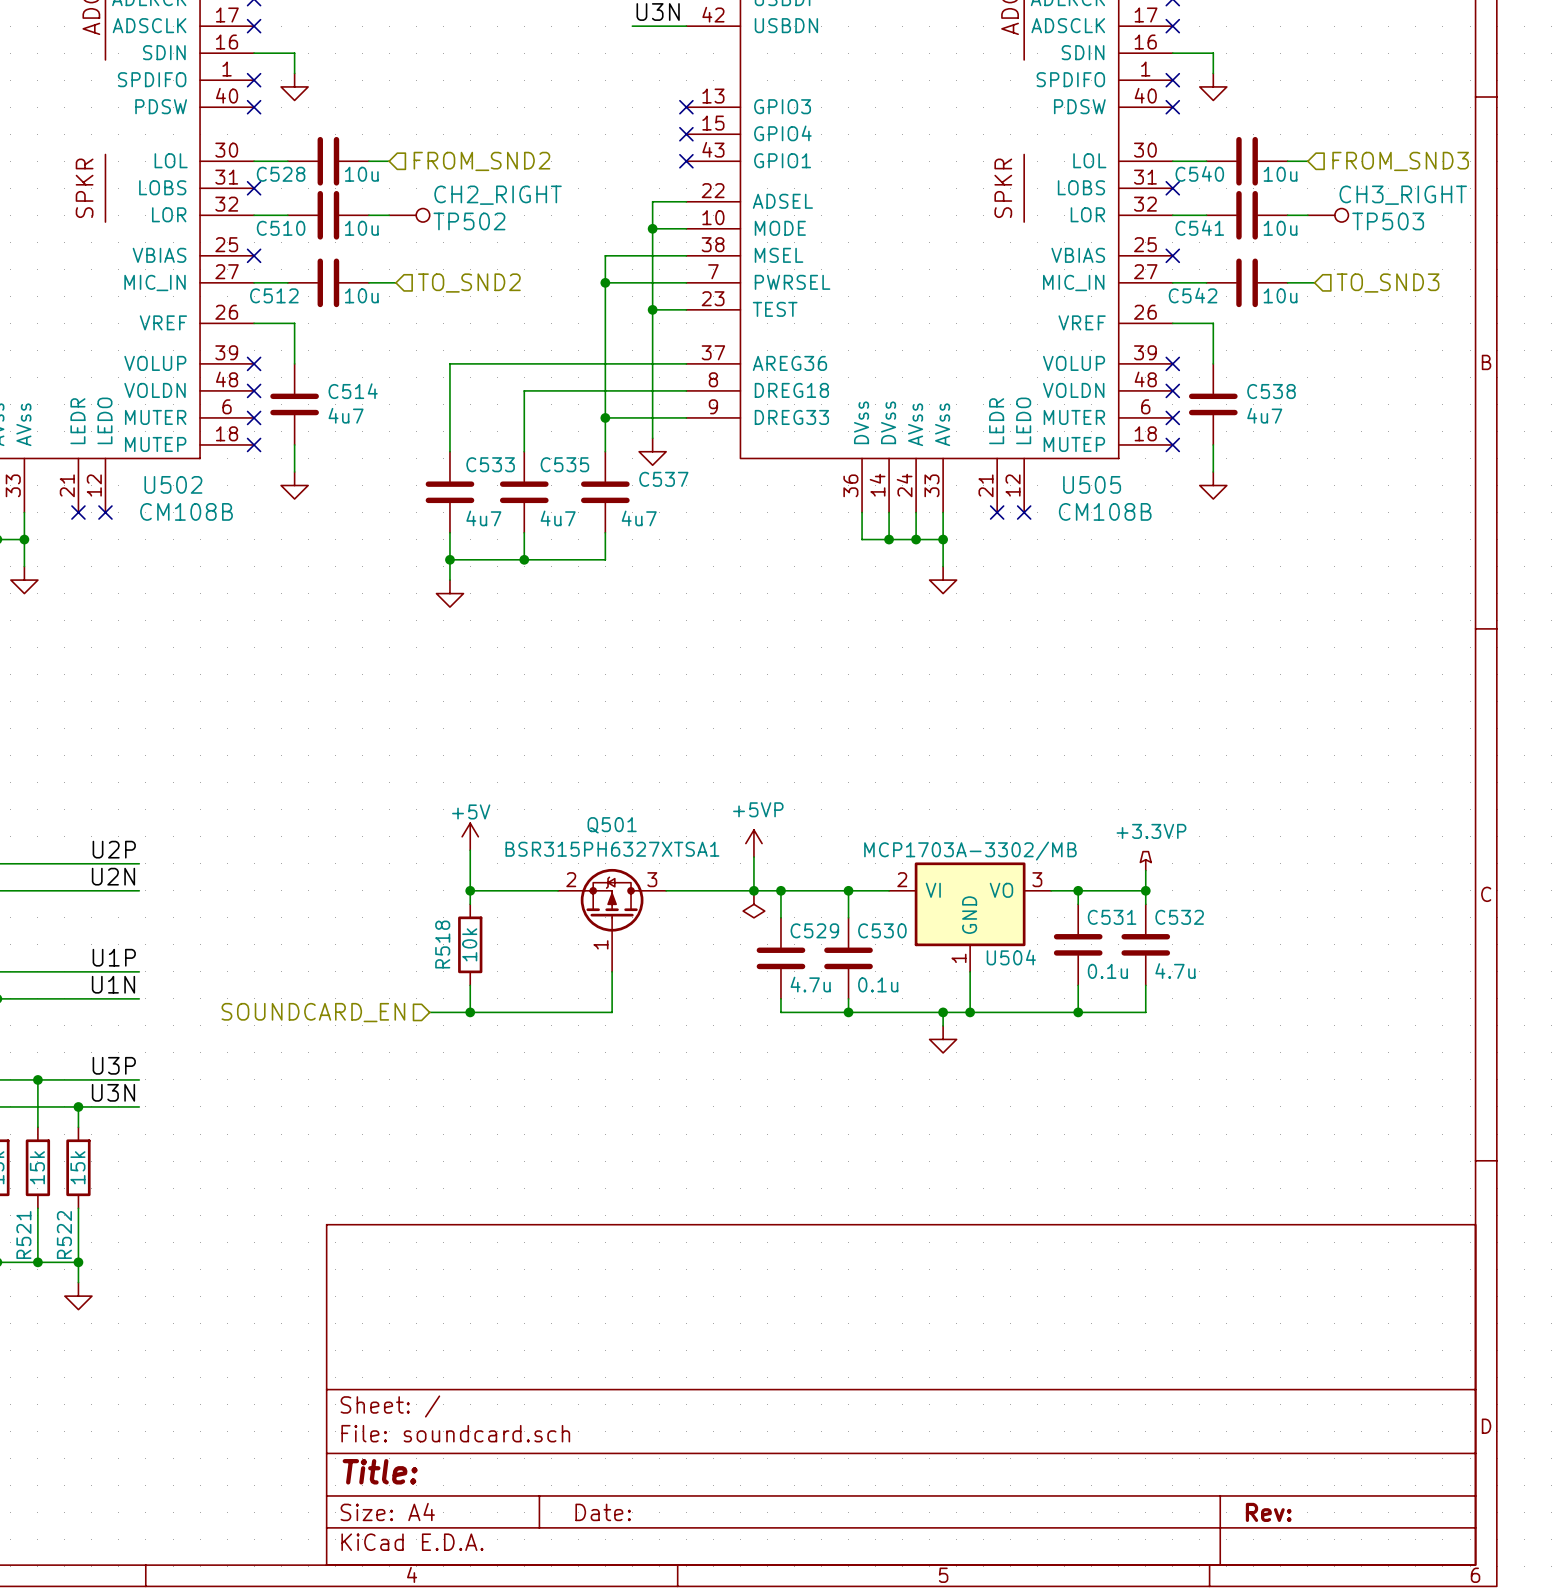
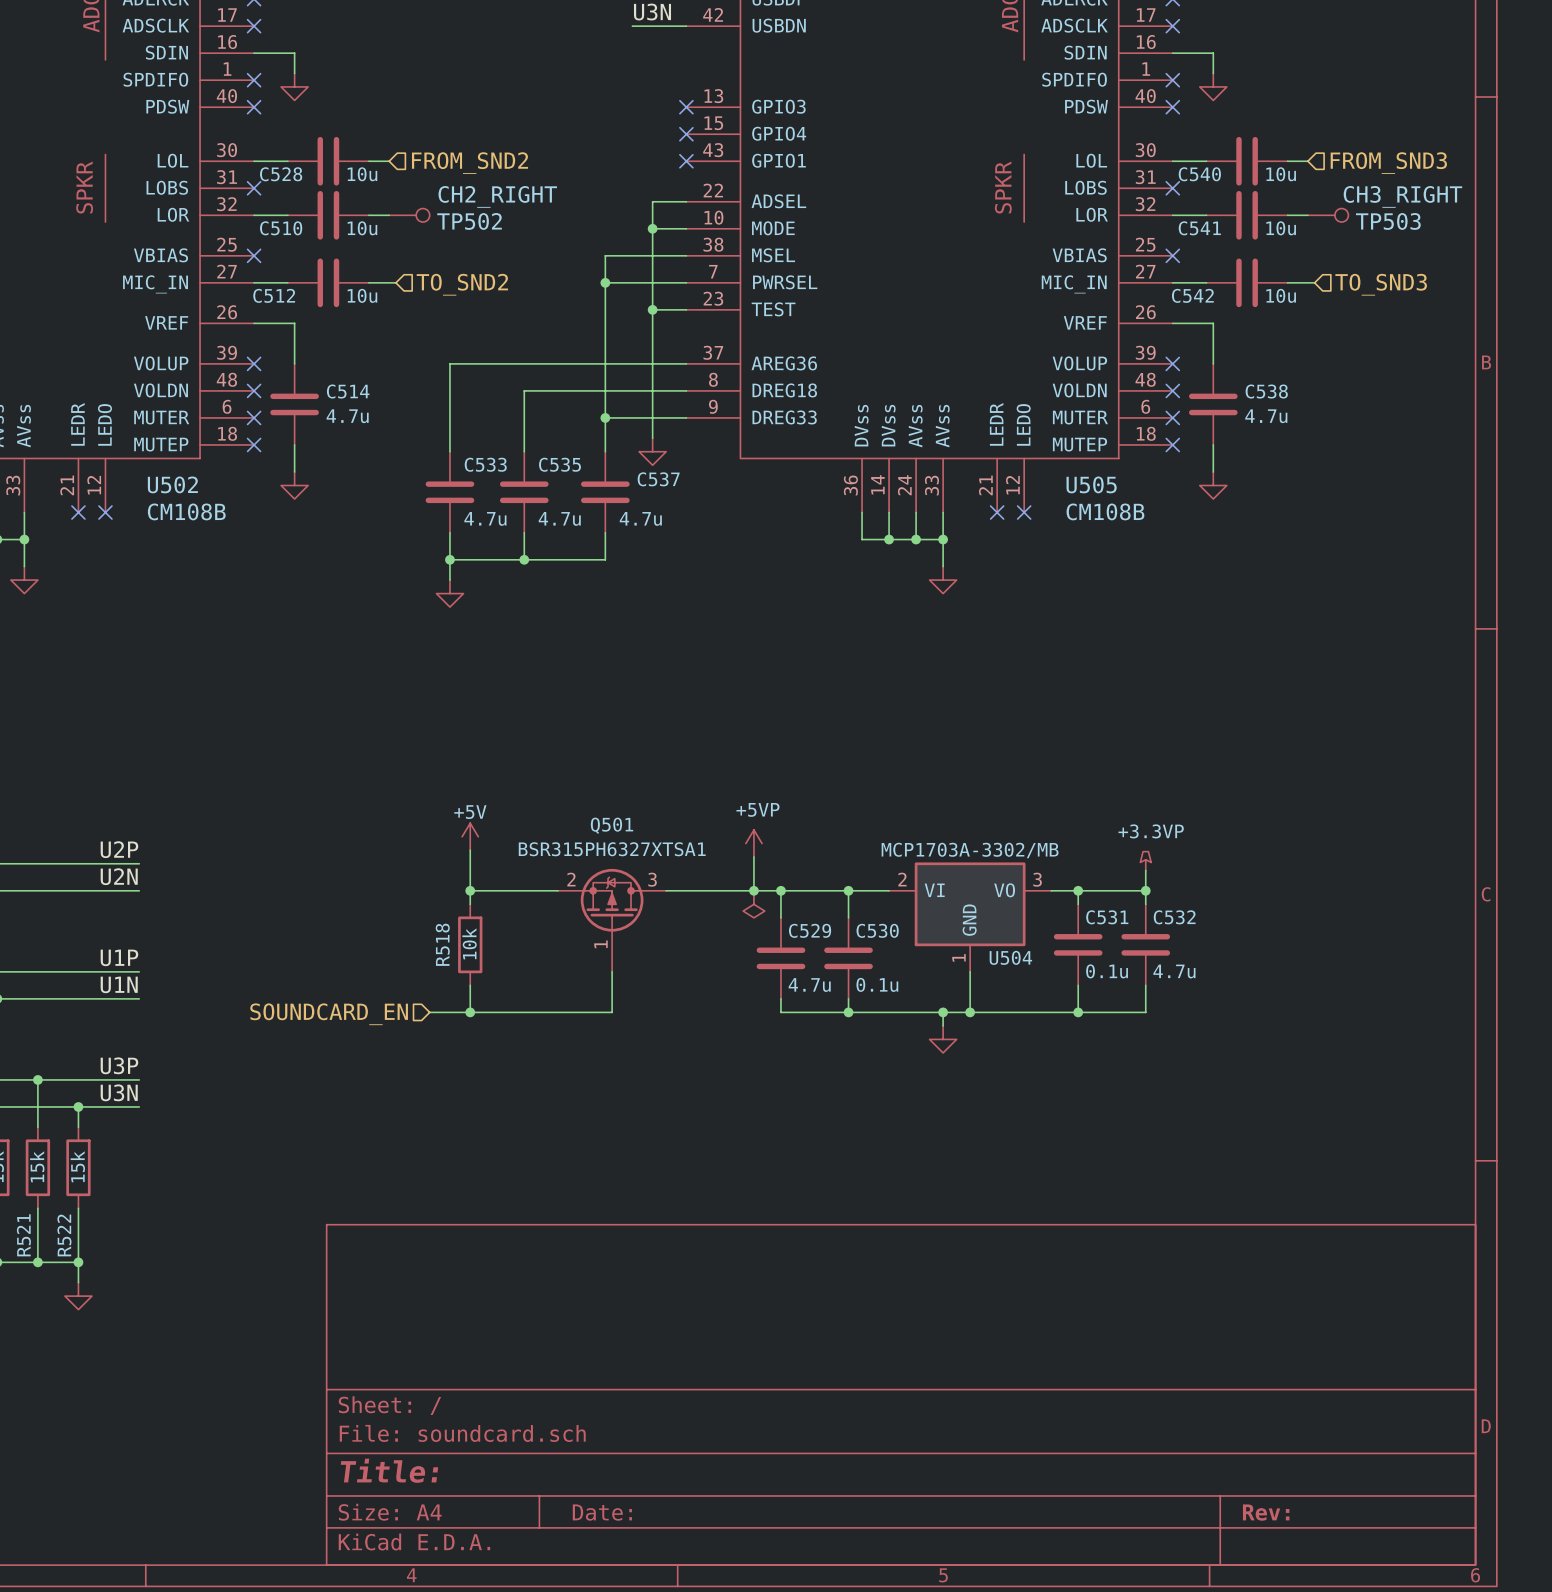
C514 value: 4u7 (346, 415) -> 4.7u (347, 416)
C538 value: 4u7 (1264, 415) -> 4.7u (1266, 416)
C533 value: 4u7 (483, 518) -> 4.7u (485, 518)
C535 value: 4u7 (558, 518) -> 4.7u (559, 518)
C537 value: 4u7 (639, 518) -> 4.7u (640, 518)

